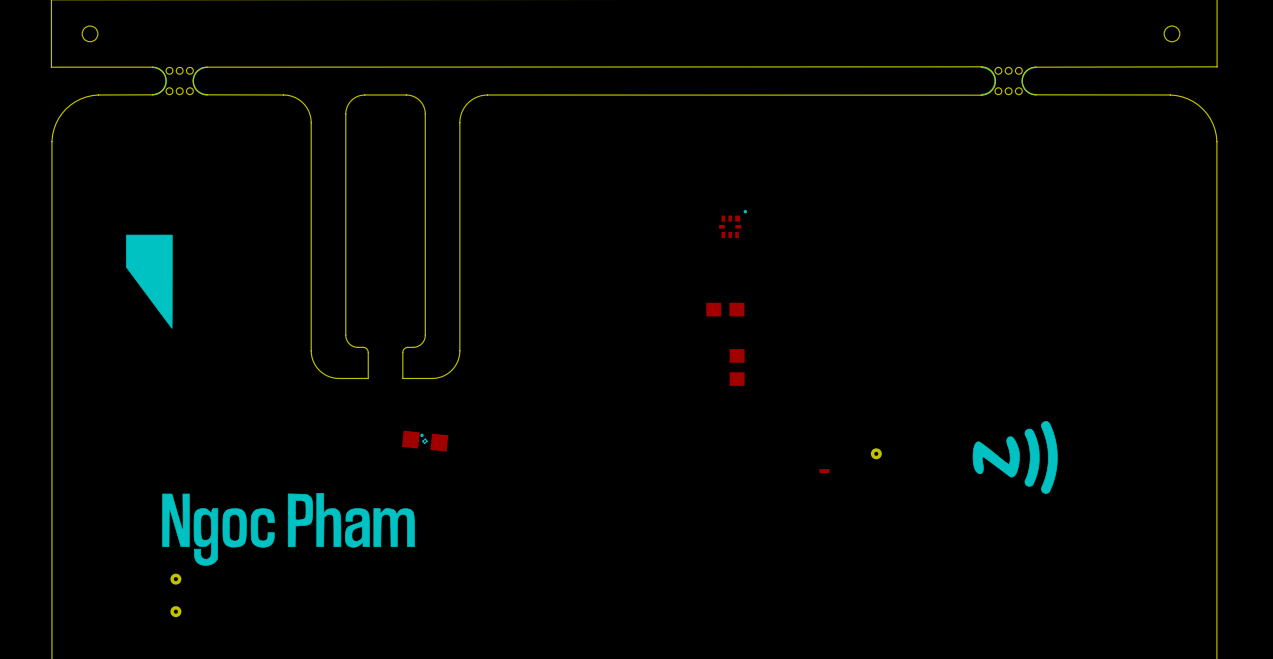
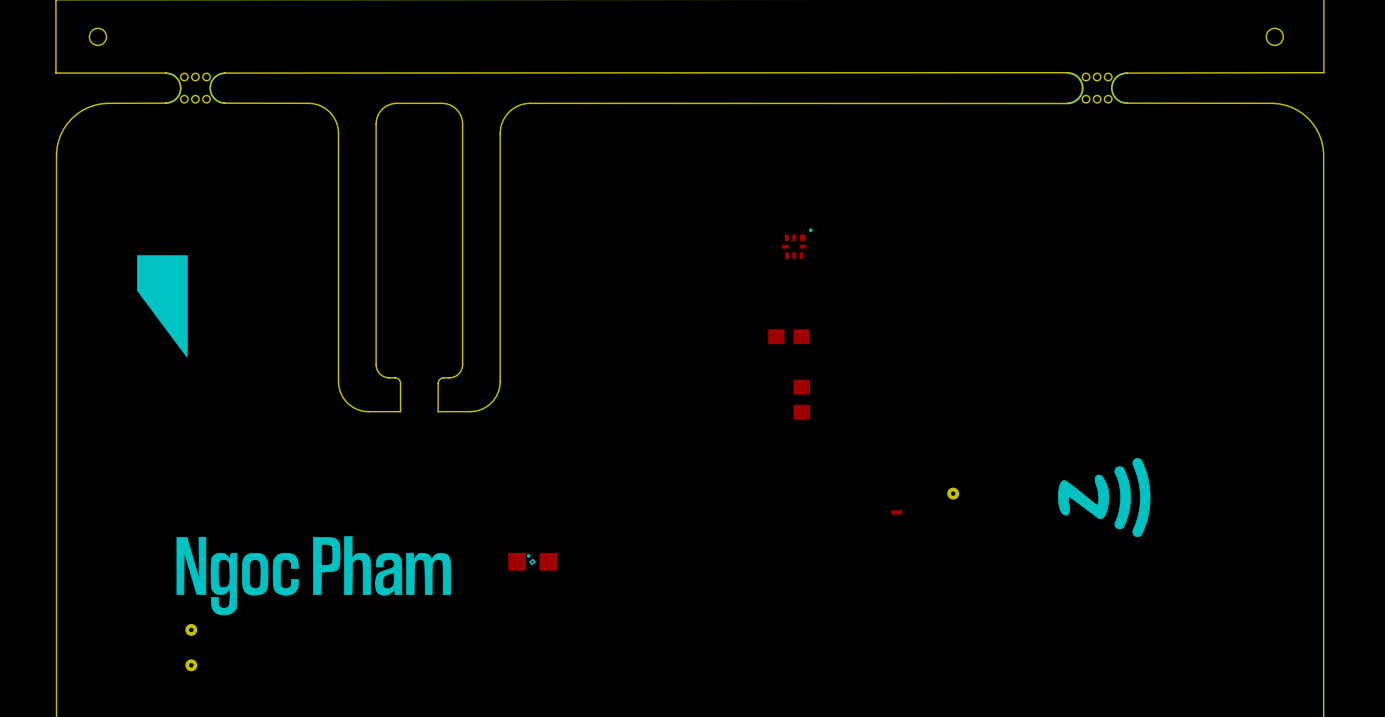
part: (425, 441) -> none
part: none -> (532, 561)

